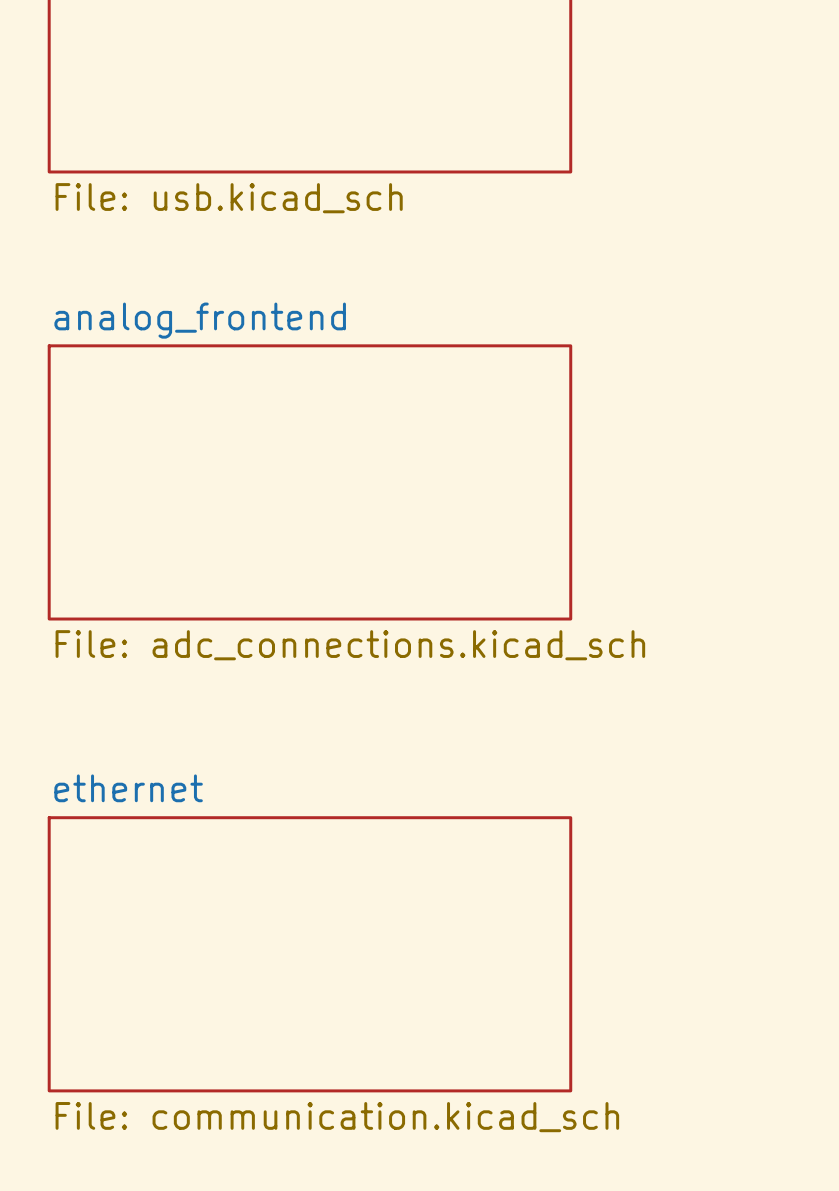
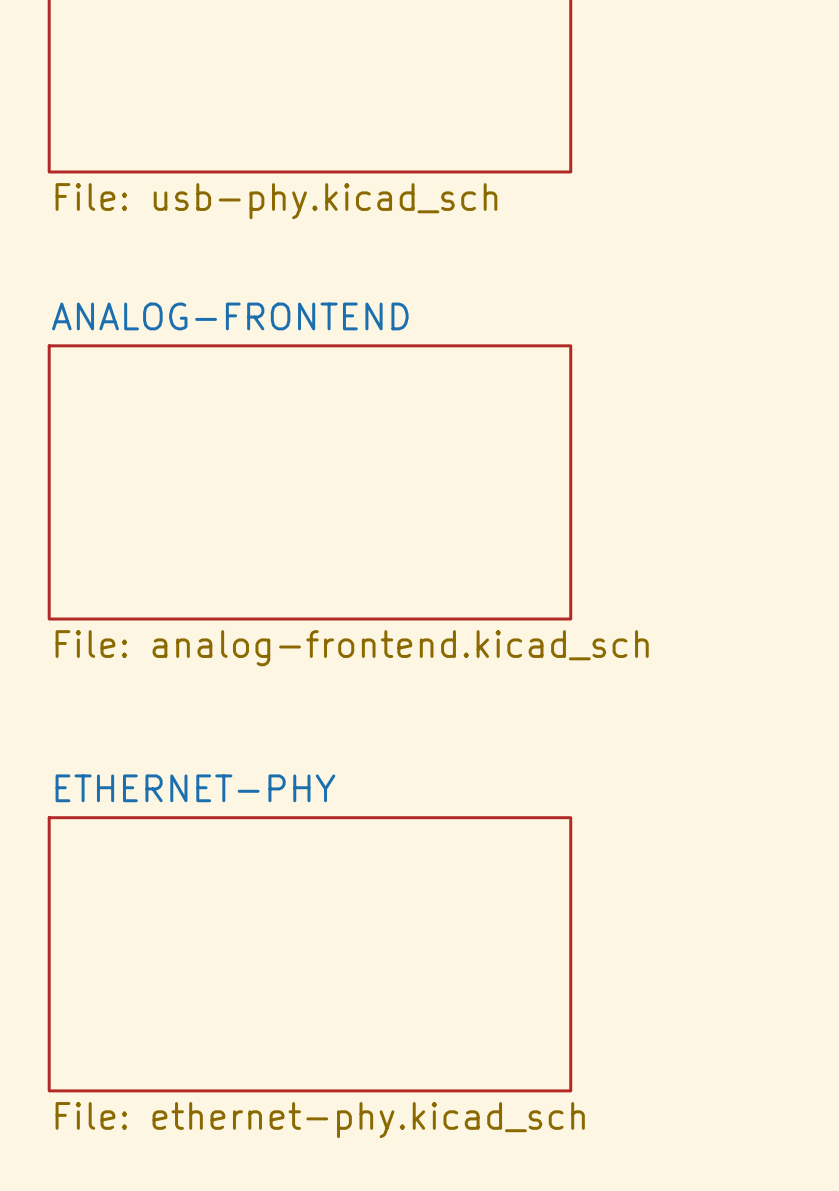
sheet value: File: usb.kicad_sch (229, 198) -> File: usb-phy.kicad_sch (276, 201)
sheet analog_frontend name: analog_frontend (200, 320) -> ANALOG-FRONTEND (230, 316)
sheet analog_frontend value: File: adc_connections.kicad_sch (350, 645) -> File: analog-frontend.kicad_sch (352, 648)
sheet ethernet name: ethernet (128, 788) -> ETHERNET-PHY (195, 788)
sheet ethernet value: File: communication.kicad_sch (337, 1117) -> File: ethernet-phy.kicad_sch (320, 1120)

